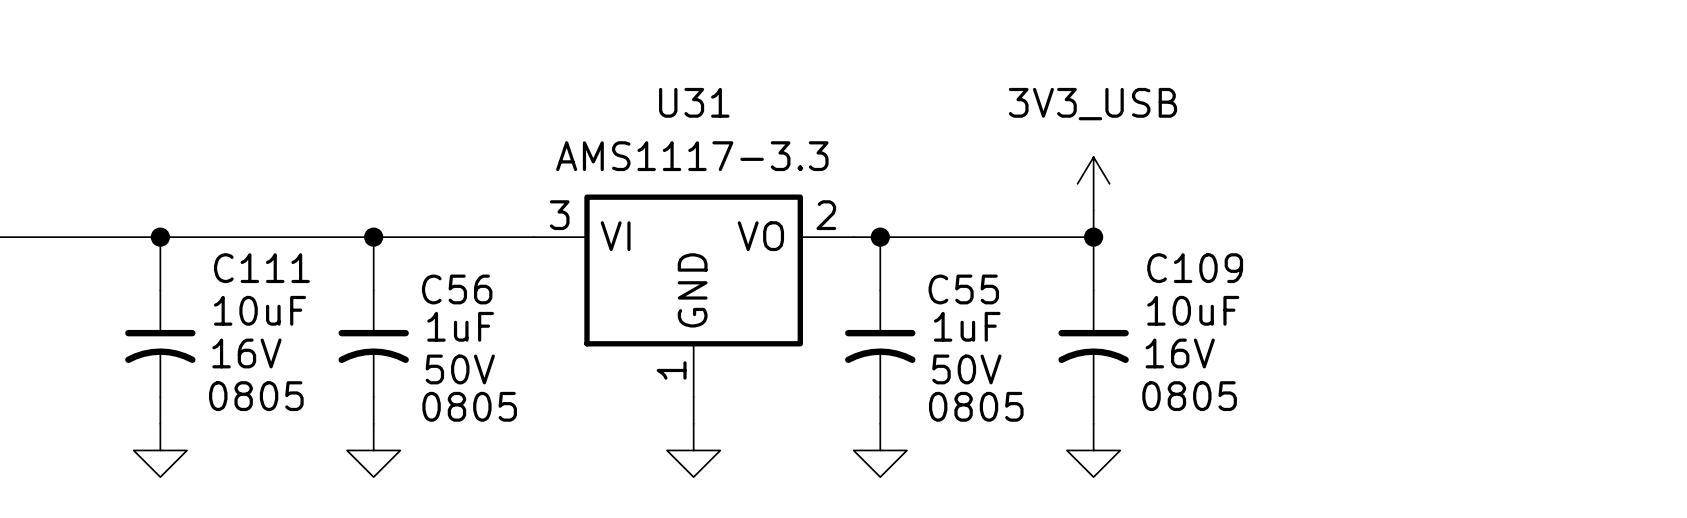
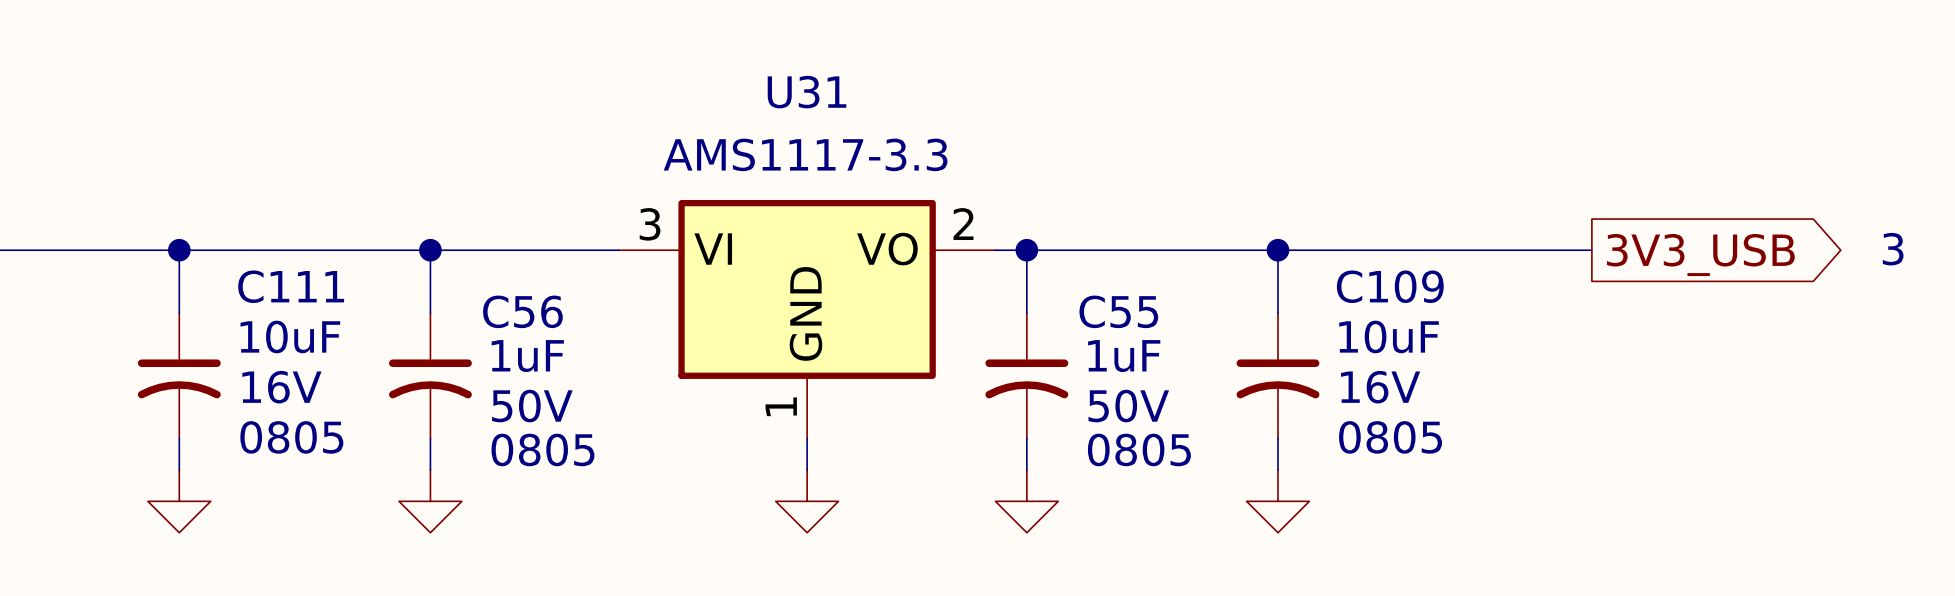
power symbol: 3V3_USB (1093, 183) -> none
wire: (1093, 210) (1093, 237) -> (1591, 250) (1277, 250)
text: none -> 3 (1893, 249)
global label: none -> 3V3_USB (1700, 255)

